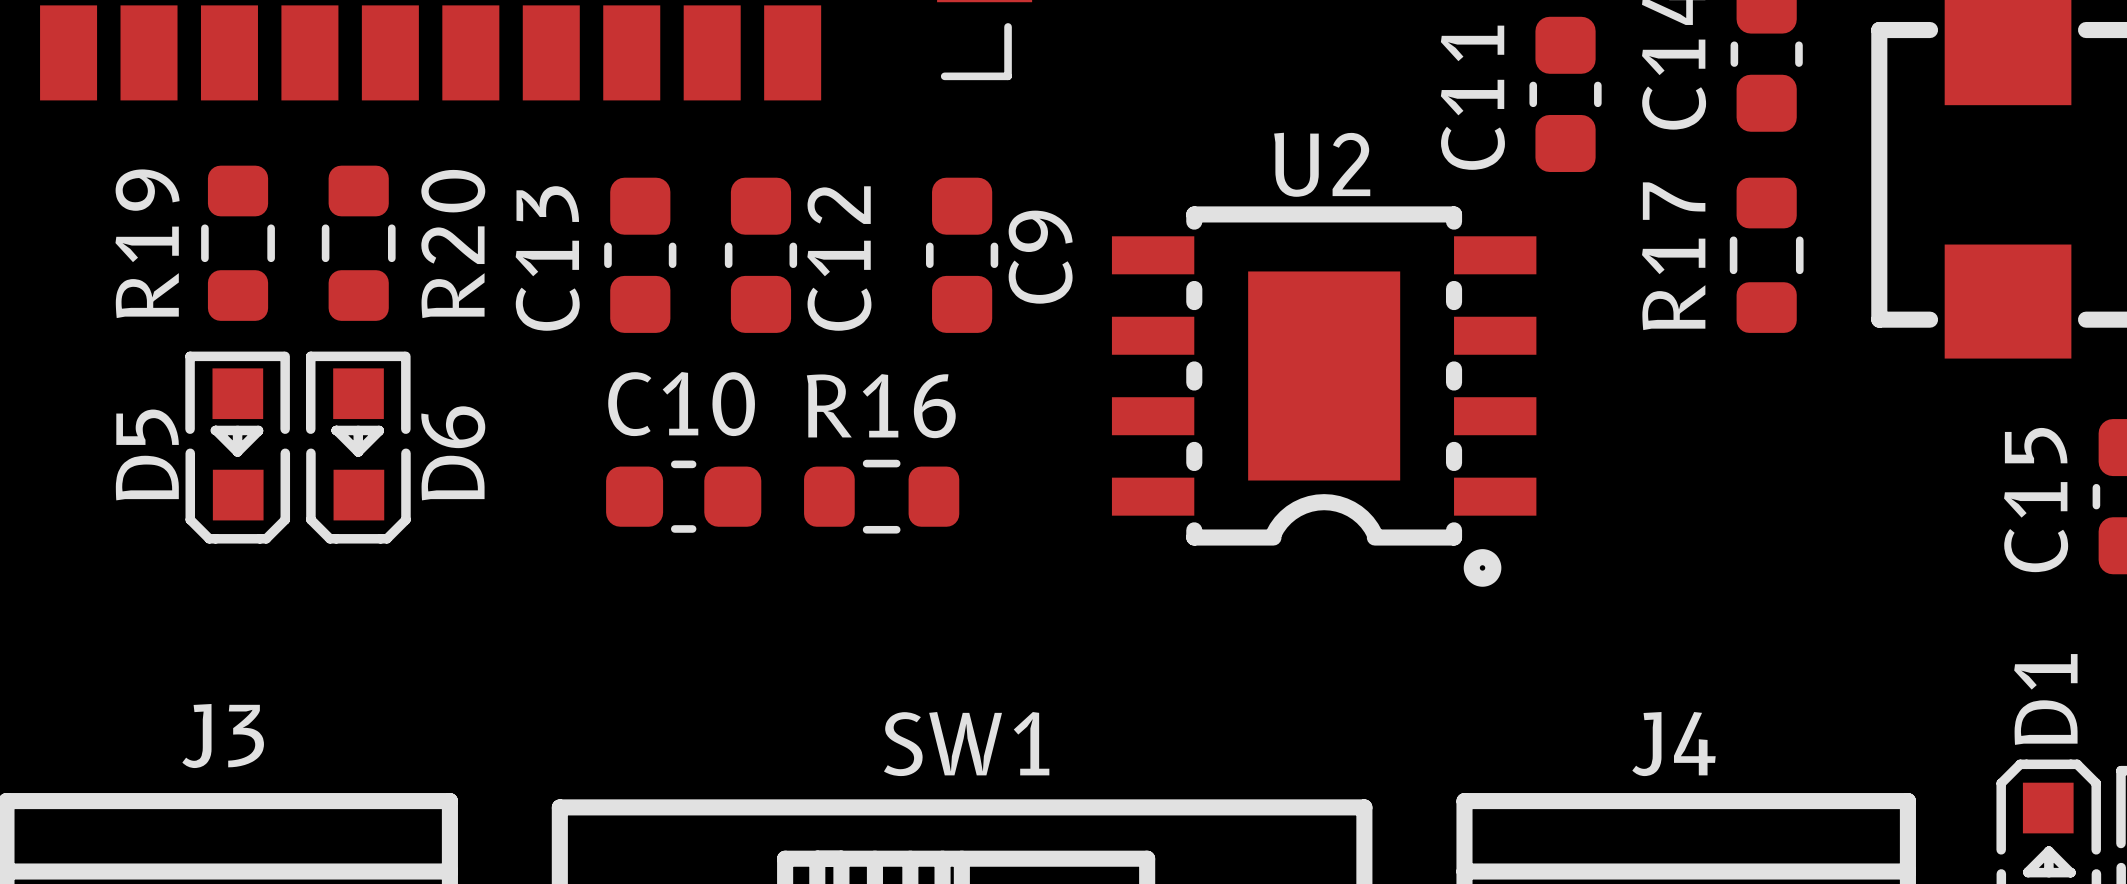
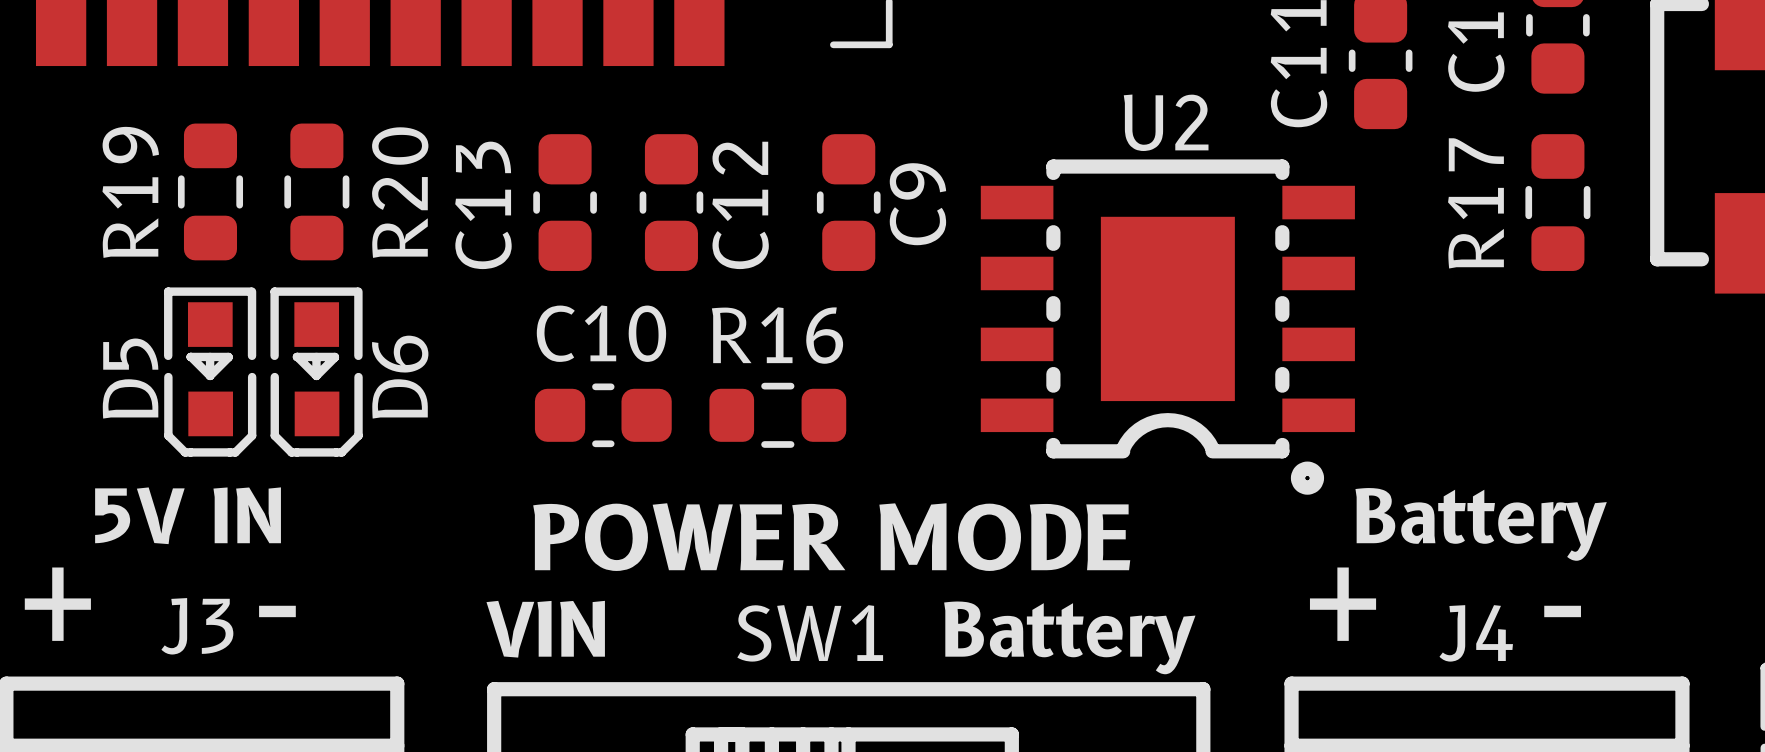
text: none -> 5V IN (188, 515)
text: none -> Battery (1481, 524)
text: none -> POWER MODE (831, 537)
J3 text: none -> + (57, 604)
J4 text: none -> + (1343, 604)
J3 text: none -> - (277, 611)
J4 text: none -> - (1562, 611)
text: none -> VIN (545, 629)
SW1 name position: SW1 (966, 744) -> SW1 (810, 633)
text: none -> Battery (1069, 637)

